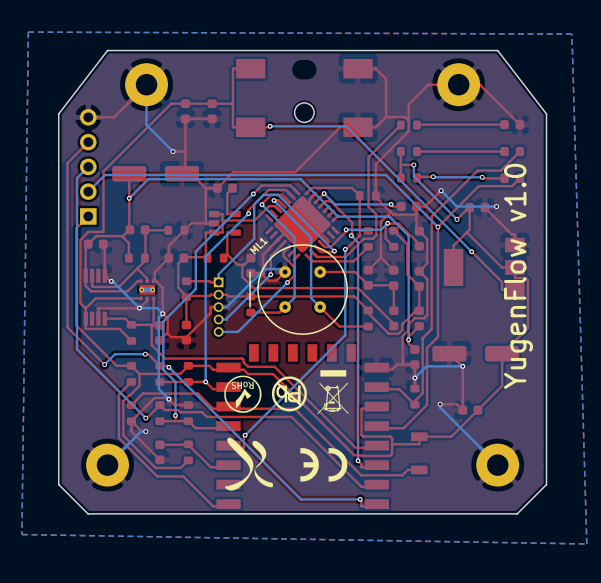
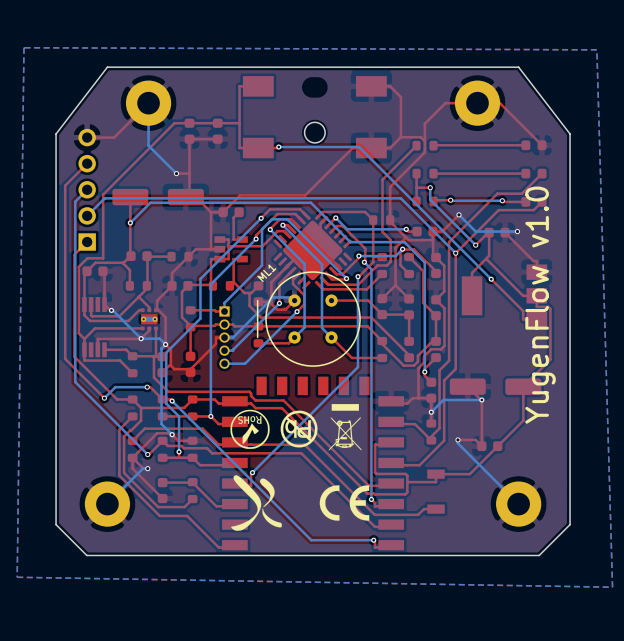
drawing shape: [300, 448, 348, 482] -> [319, 485, 370, 521]

